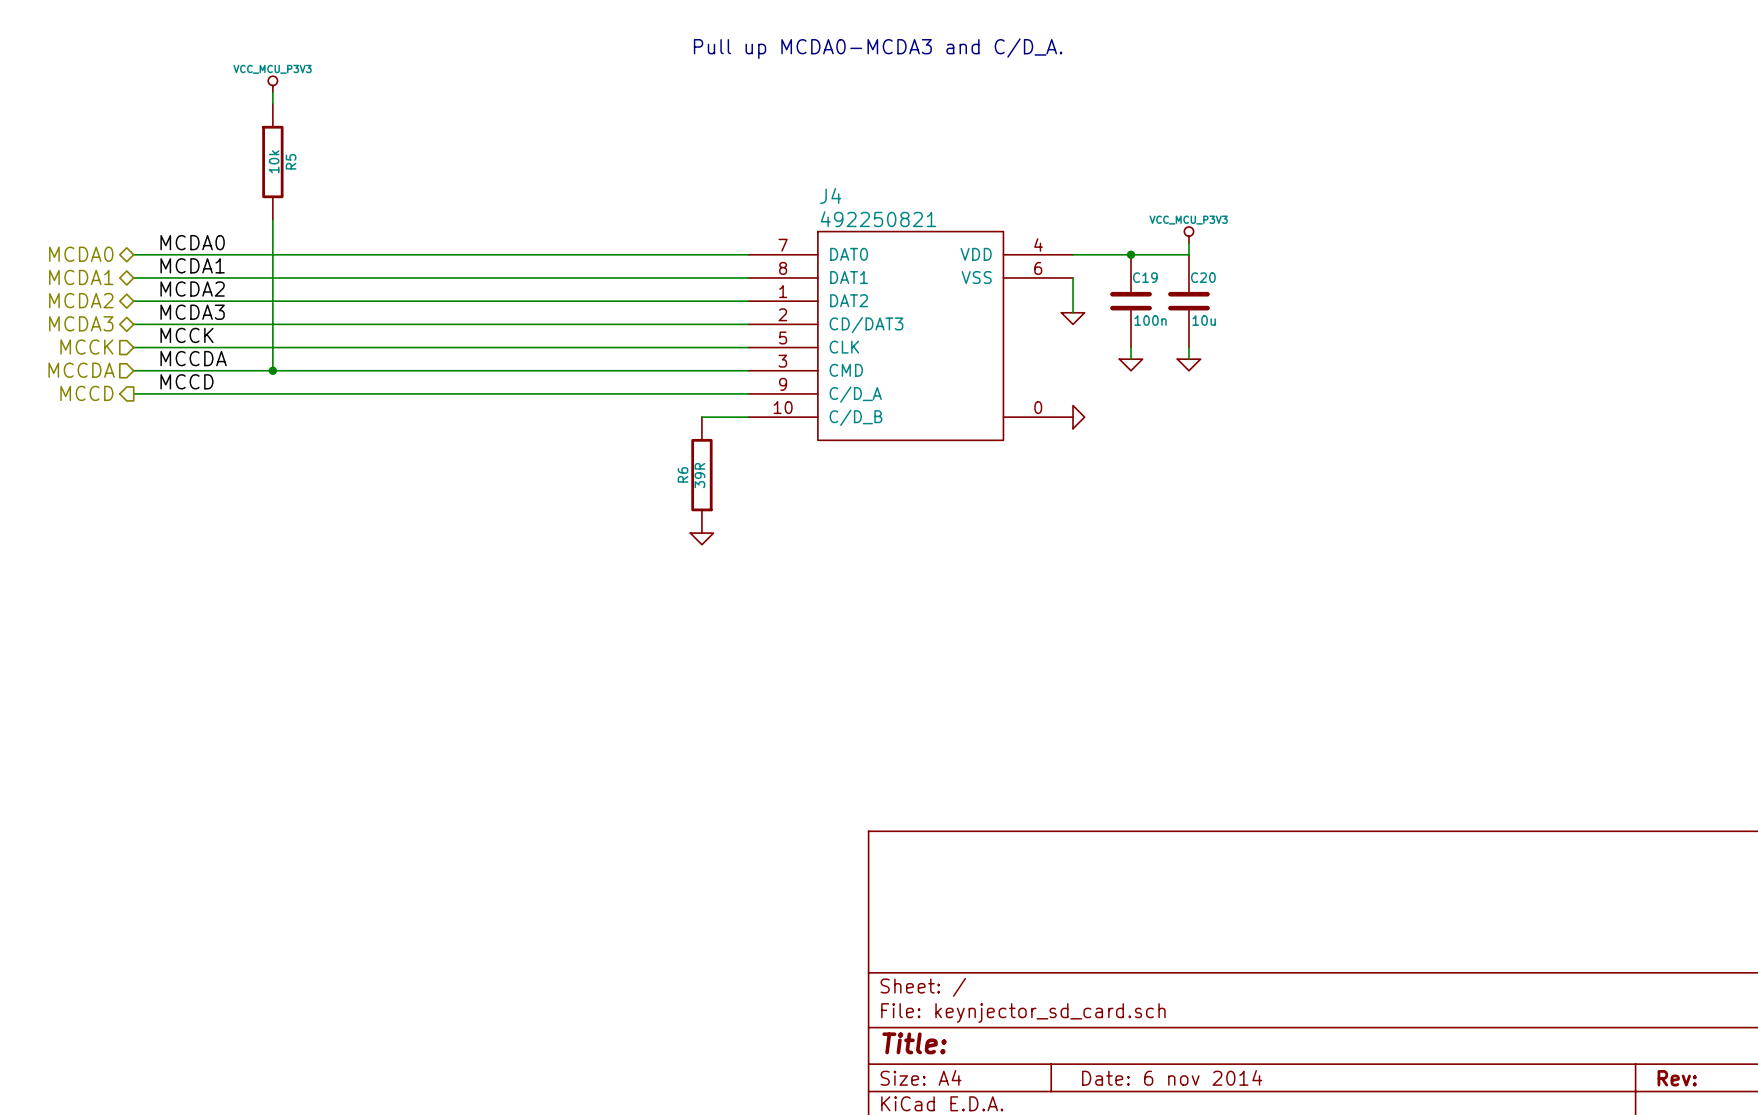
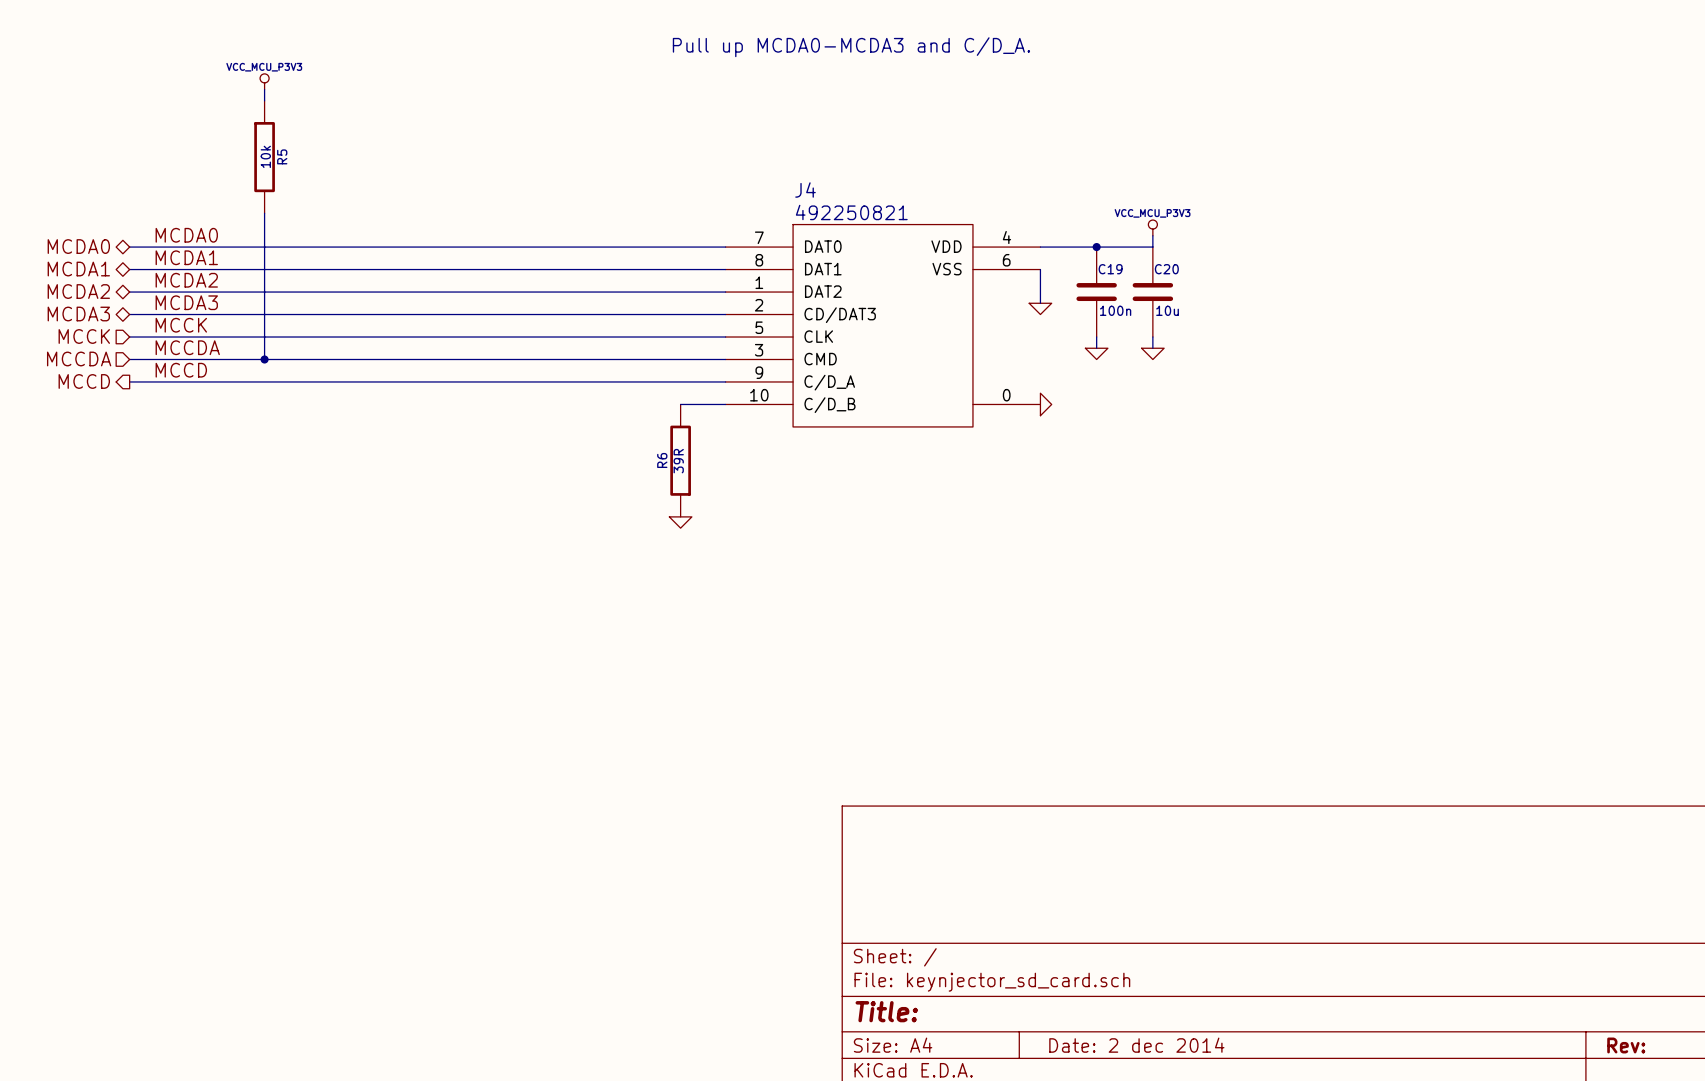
title block: Date: 6 nov 2014 (1172, 1077) -> Date: 2 dec 2014 (1136, 1045)

